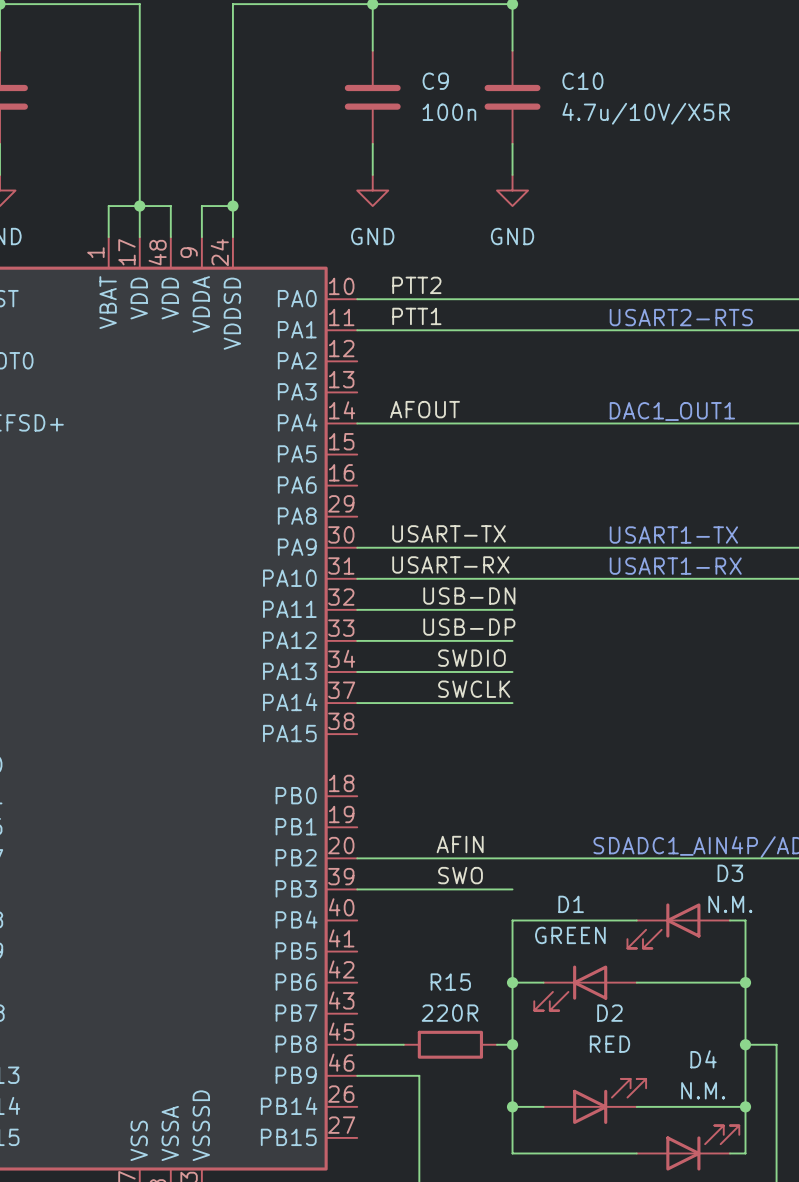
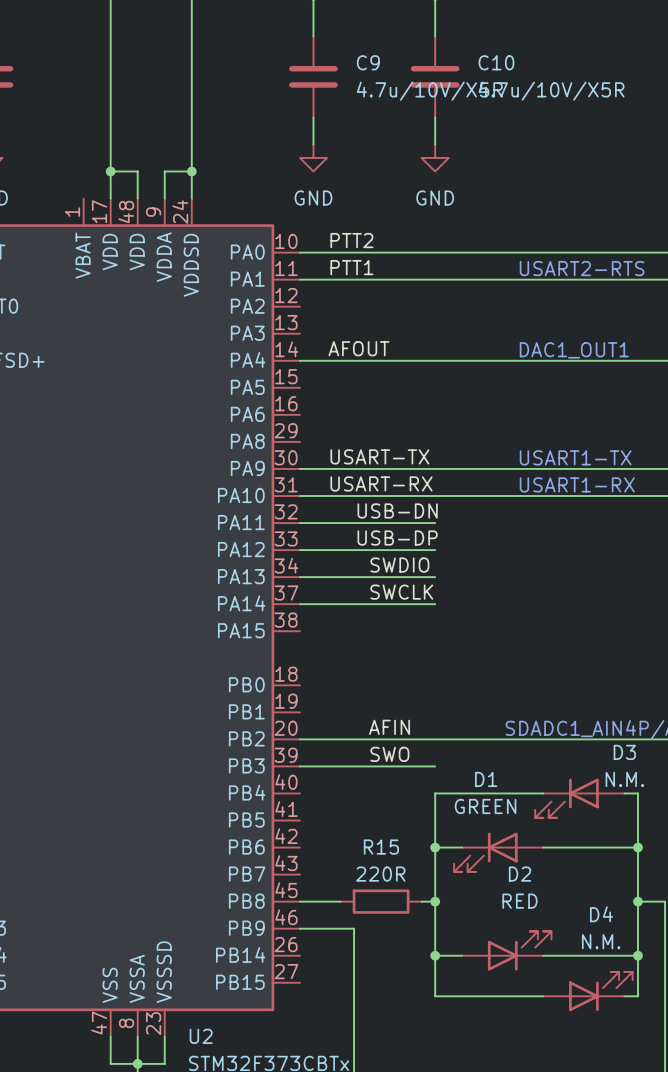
C9 value: 100n (449, 112) -> 4.7u/10V/X5R (429, 91)
wire: (139, 206) (108, 206) (108, 237) -> none

